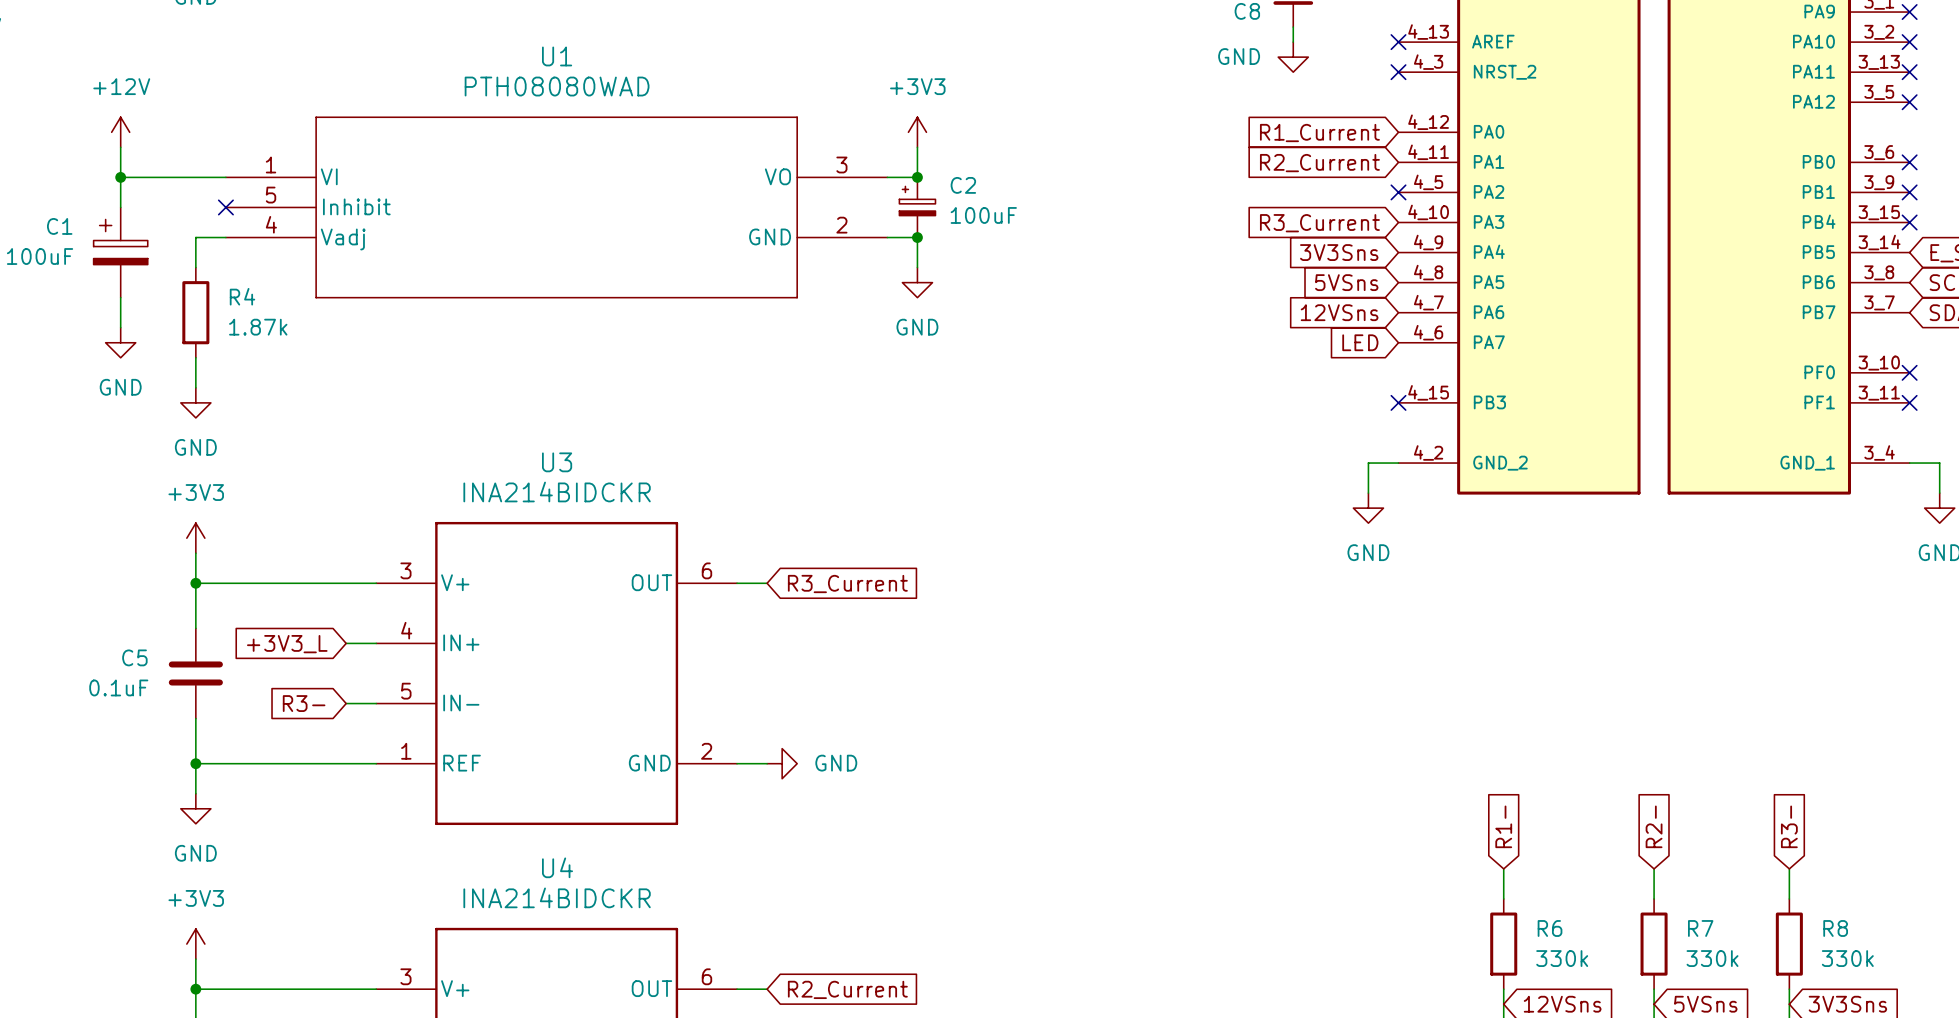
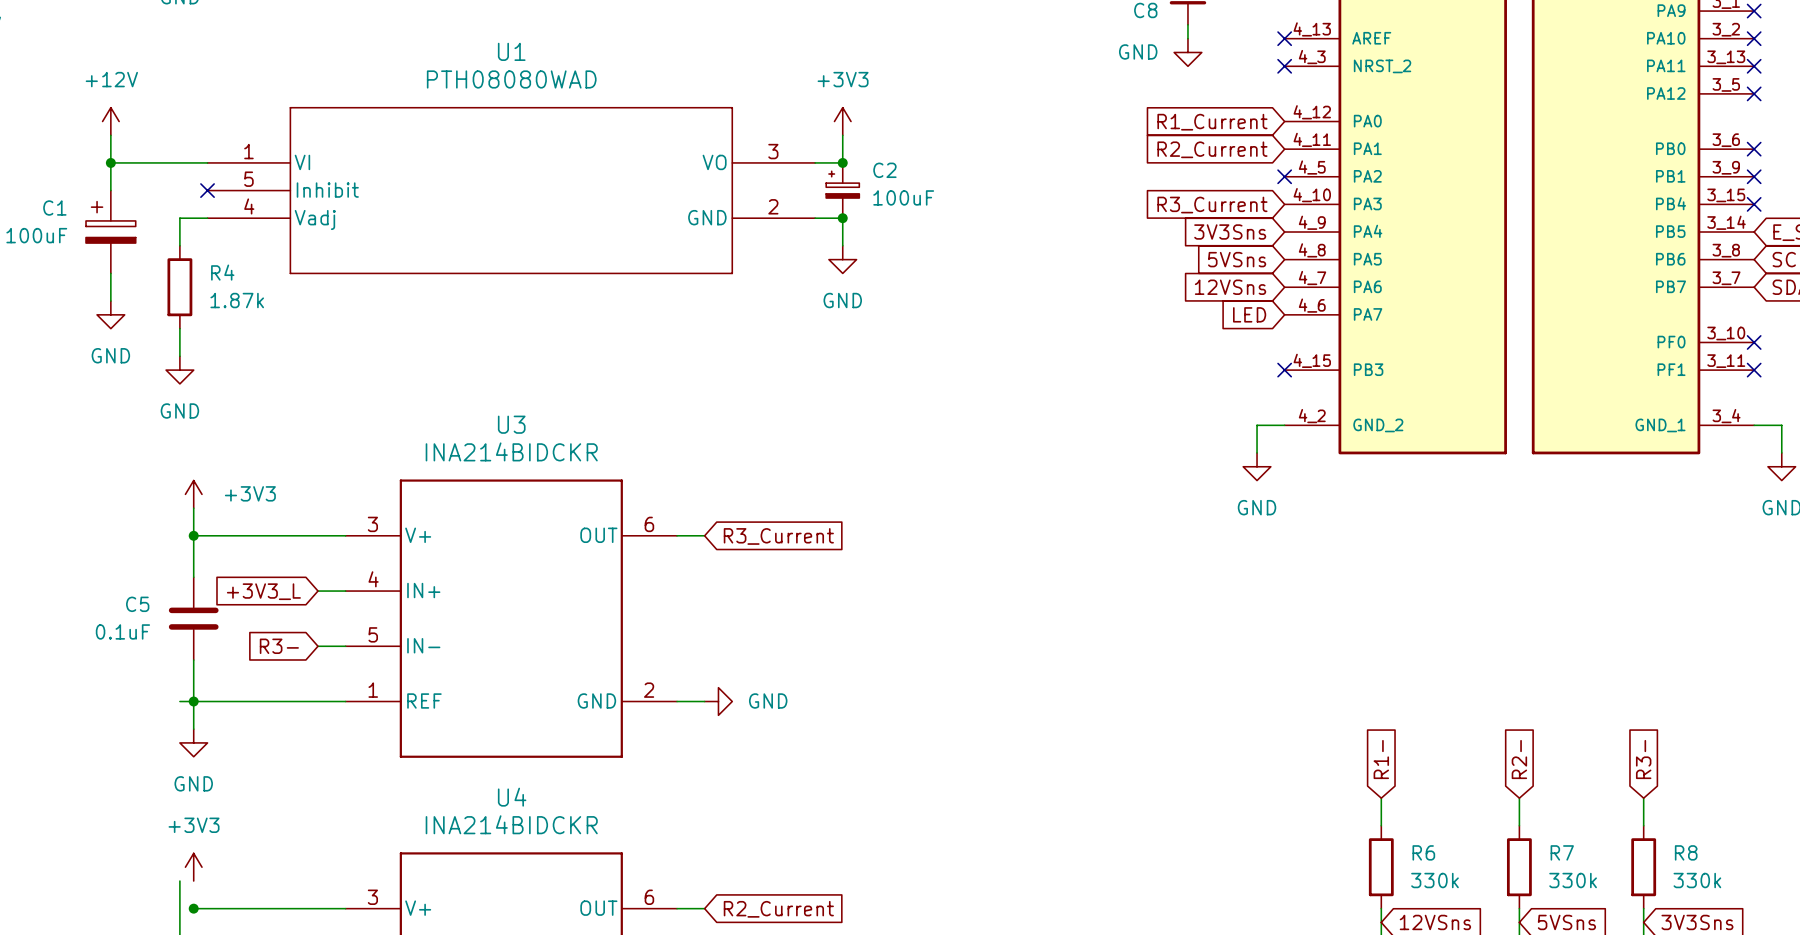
power symbol text position: +3V3 (196, 492) -> +3V3 (250, 493)
power symbol position: +3V3 (195, 538) -> +3V3 (193, 494)
wire: (195, 553) (195, 628) -> (193, 508) (193, 577)
wire: (195, 583) (210, 583) -> none
junction position: (195, 583) -> (193, 535)
C5 position: (195, 673) -> (193, 618)
wire: (195, 718) (195, 793) -> (193, 660) (193, 729)
junction position: (195, 763) -> (193, 701)
power symbol position: GND (195, 808) -> GND (193, 742)
power symbol position: +3V3 (195, 944) -> +3V3 (193, 867)
wire: (195, 989) (210, 989) -> none
junction position: (195, 989) -> (193, 908)

